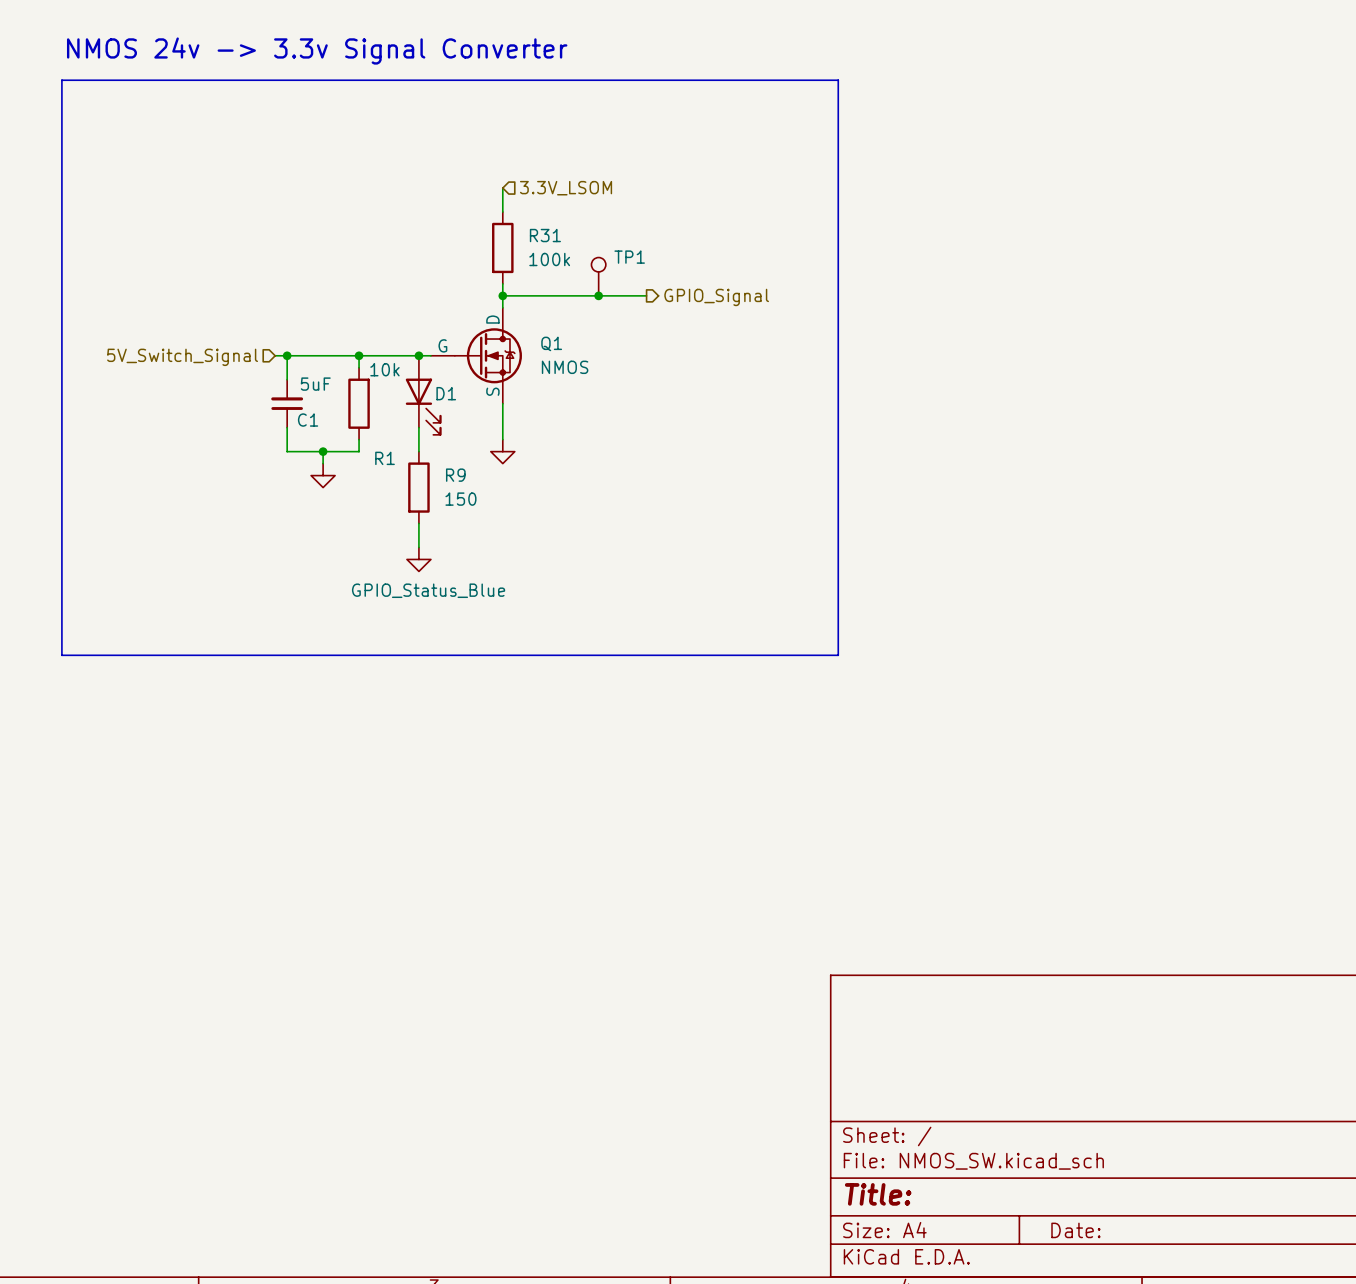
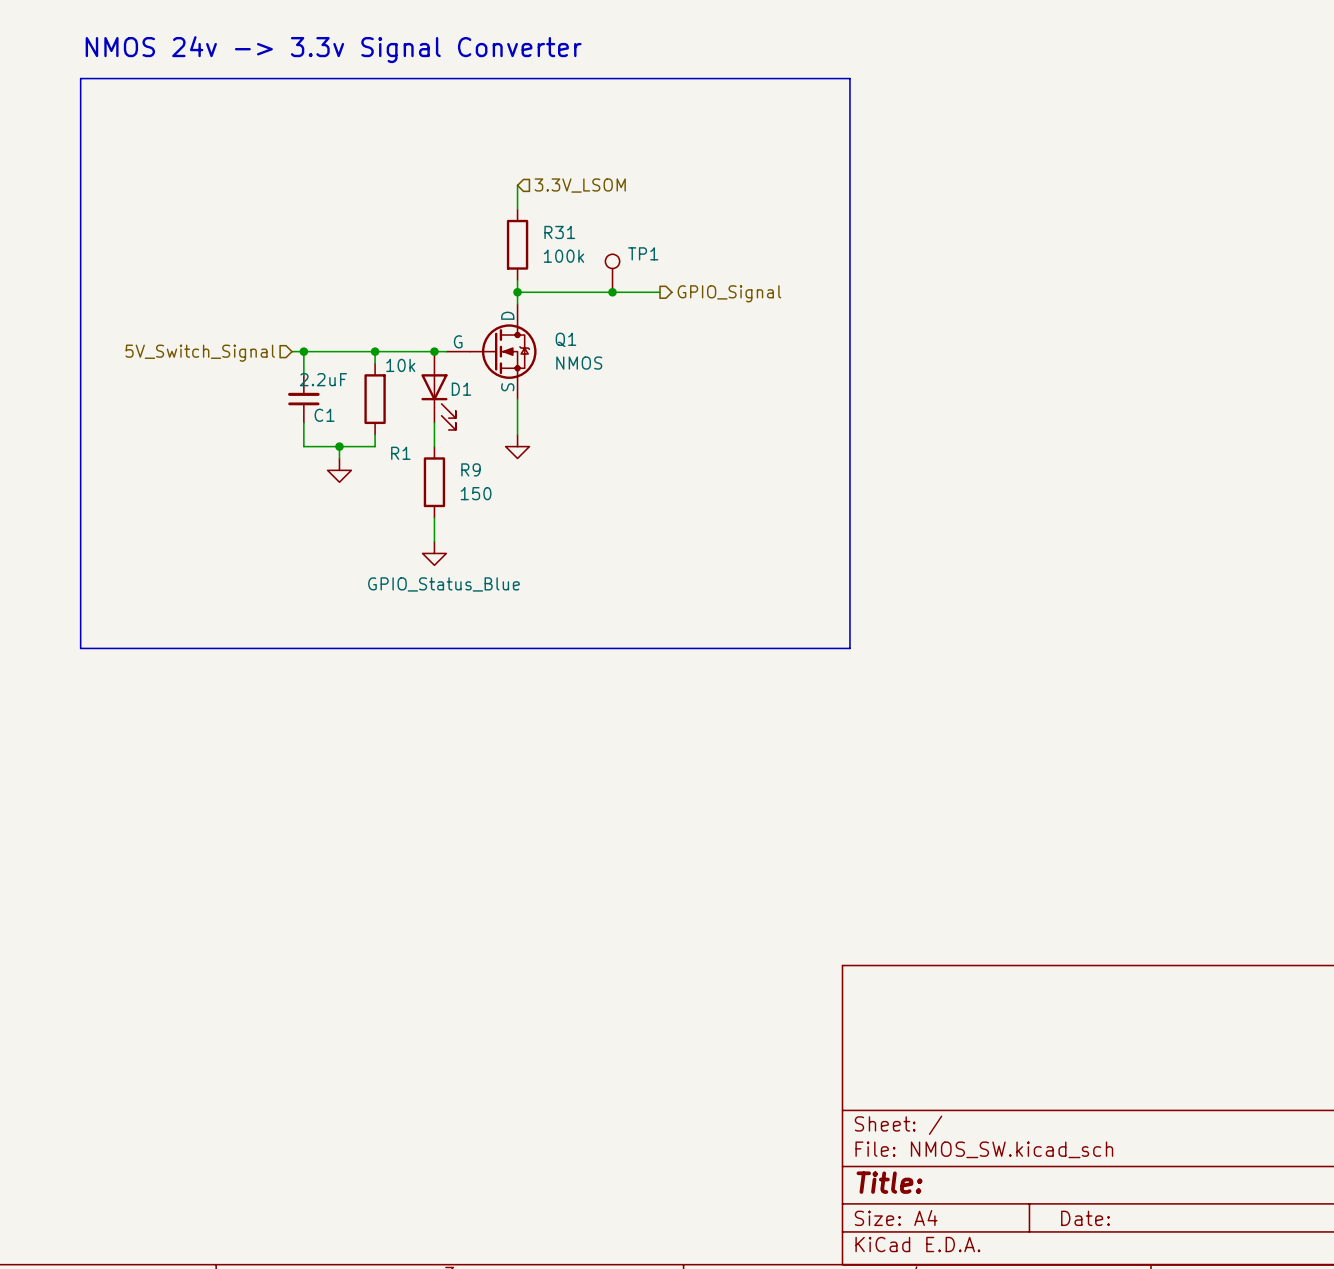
C1 value: 5uF (315, 384) -> 2.2uF (323, 379)

